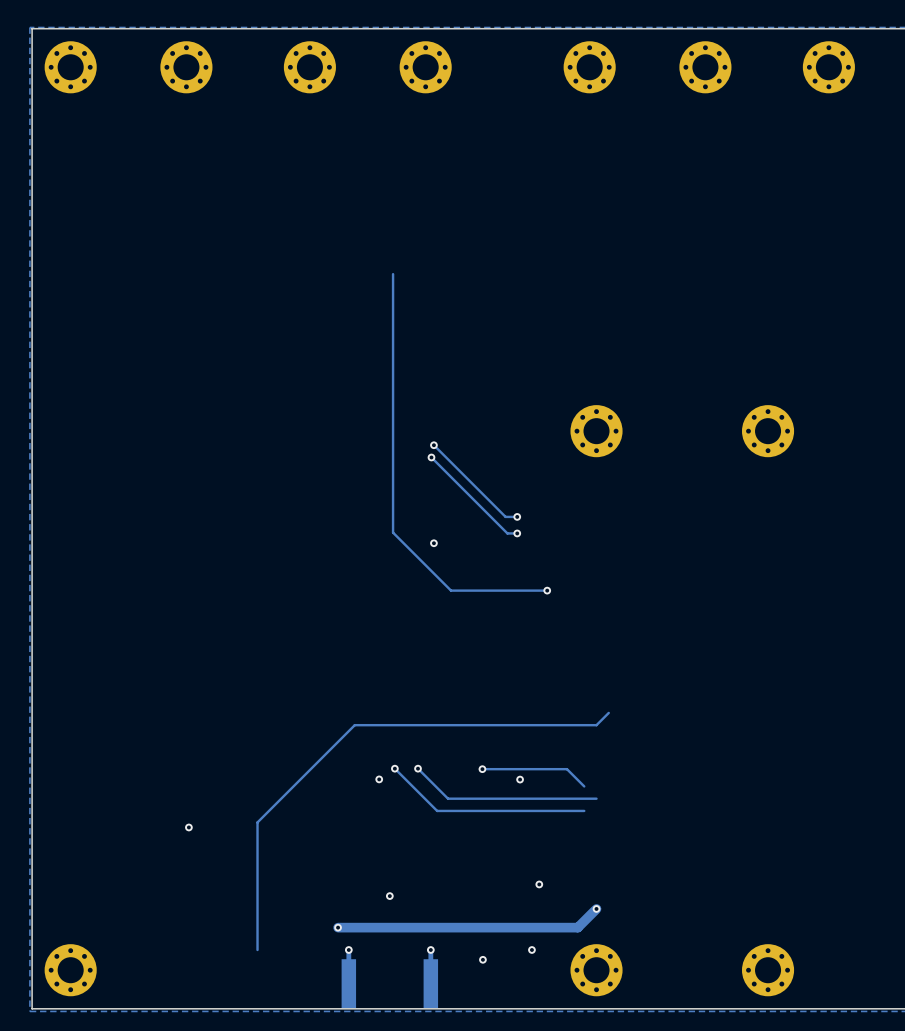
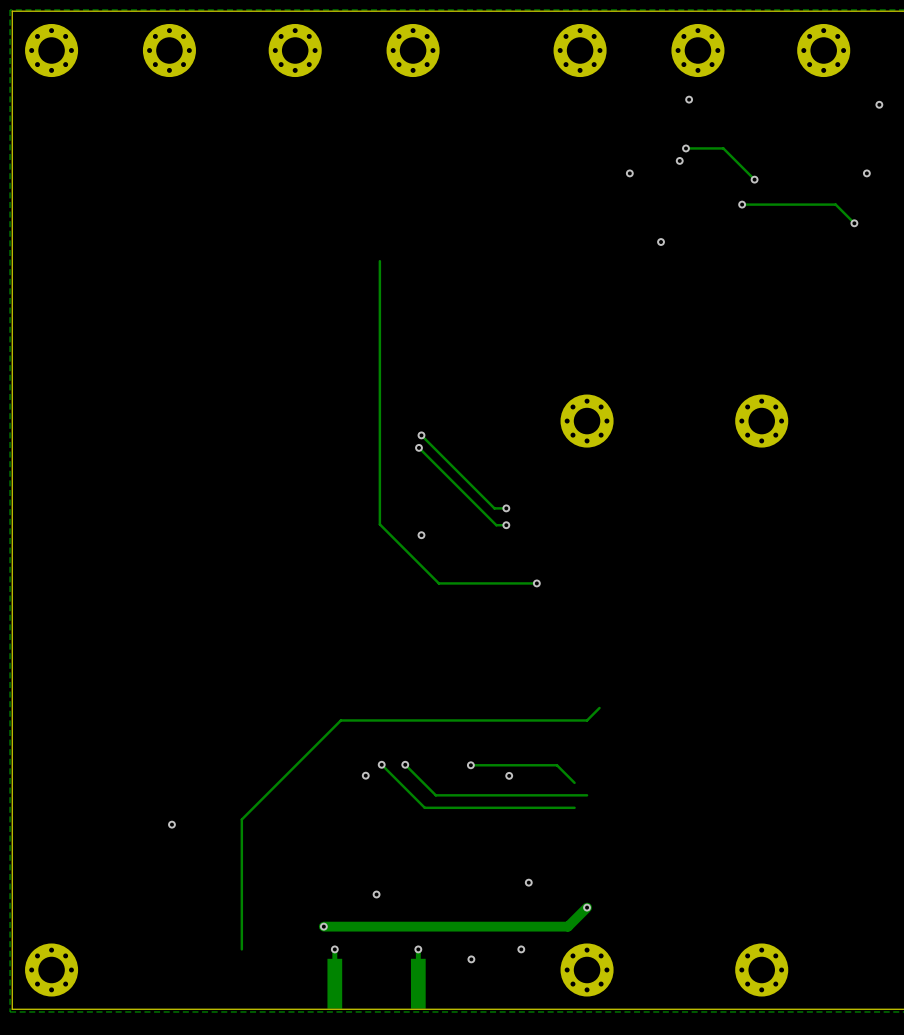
via: none -> (689, 99)
via: none -> (879, 104)
track: none -> (685, 148) (723, 148) (754, 179)
via: none -> (685, 148)
via: none -> (679, 160)
via: none -> (629, 173)
via: none -> (866, 173)
via: none -> (754, 179)
track: none -> (742, 204) (835, 204) (854, 223)
via: none -> (742, 204)
via: none -> (854, 223)
via: none -> (661, 242)

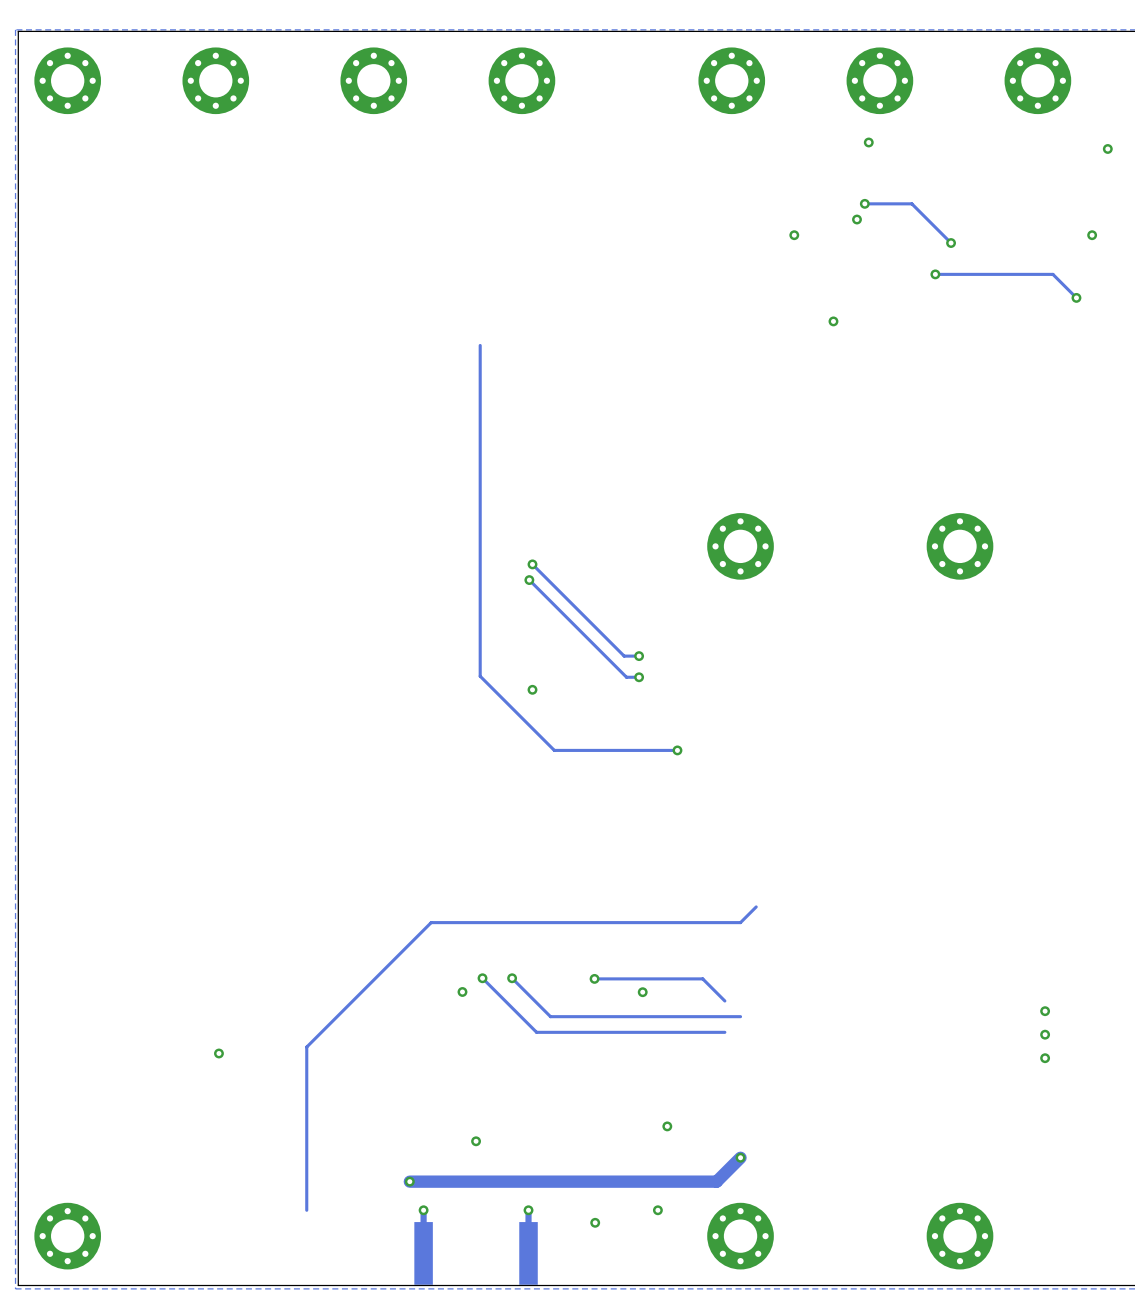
via: none -> (1045, 1011)
via: none -> (1045, 1034)
via: none -> (1045, 1058)

